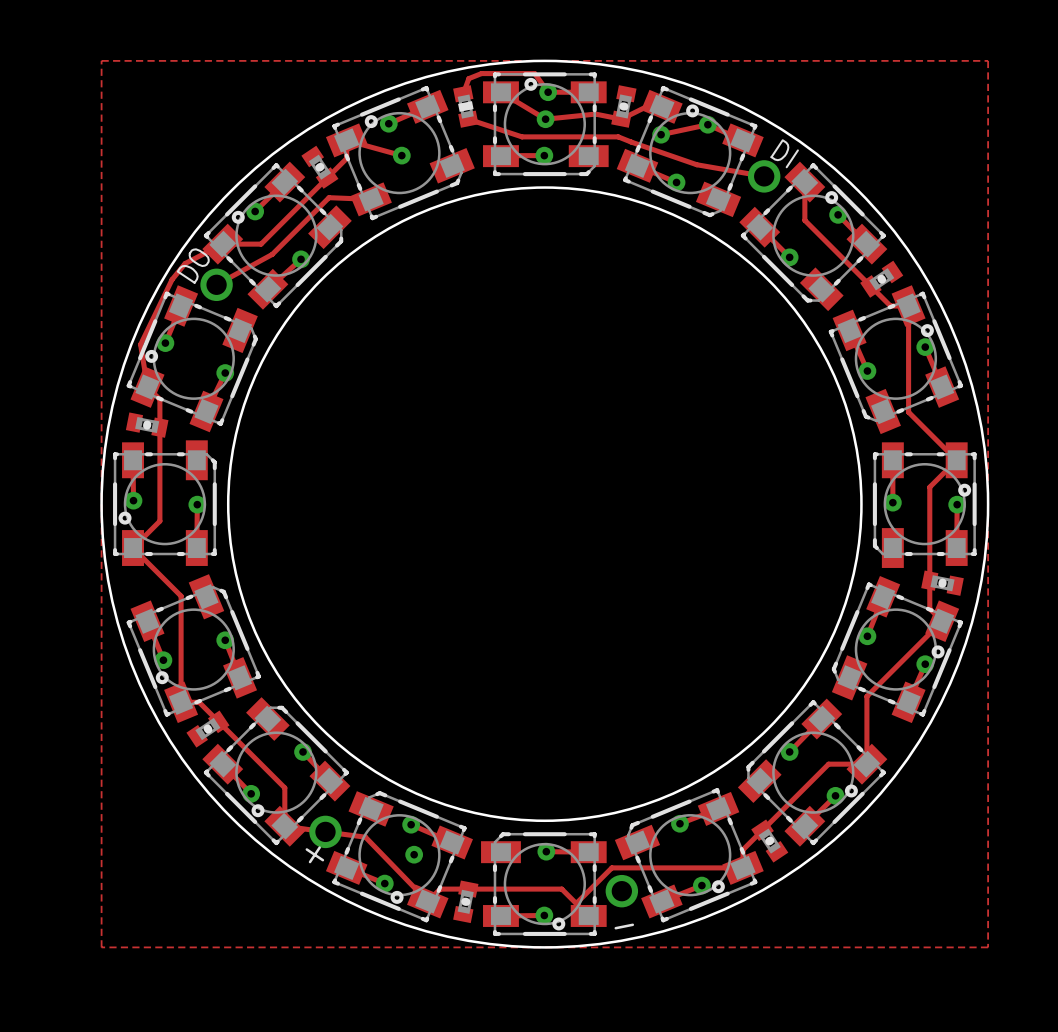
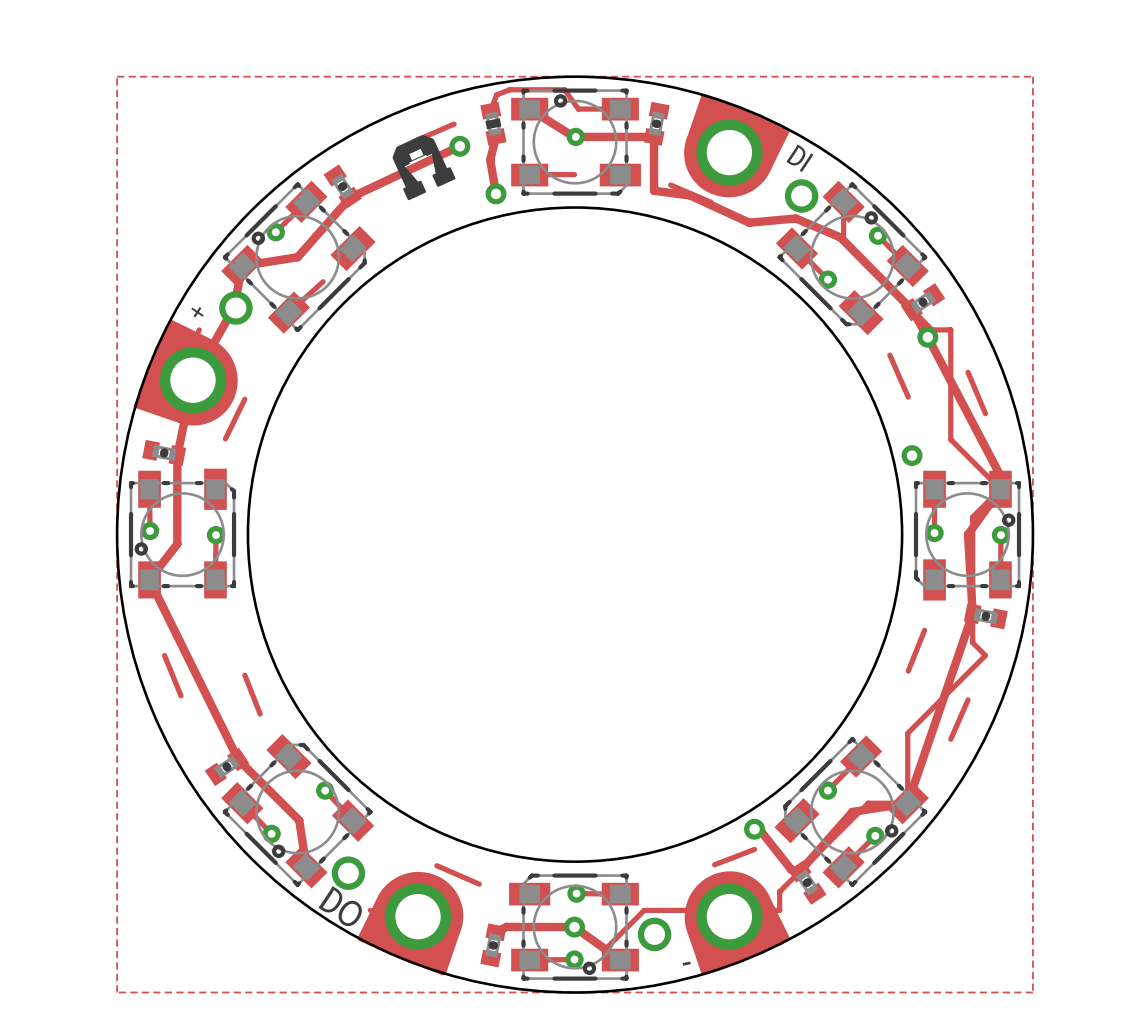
track: (500, 92) (545, 119) (595, 114) (621, 119) (652, 104) (661, 106) -> (529, 109) (573, 136) (654, 136) (654, 190) (690, 195) (749, 222) (795, 218) (840, 237) (911, 309) (1001, 477) (1000, 489) (968, 534) (972, 613) (907, 803) (852, 811) (799, 871) (791, 869) (761, 832) (754, 829)
via: (548, 92) -> none
drawing: none -> [392, 135, 456, 201]
track: (468, 119) (522, 136) (618, 136) (696, 164) (764, 176) -> (496, 136) (490, 159) (496, 193)
via: (388, 123) -> none
via: (707, 124) -> none
part: none -> (736, 145)
track: none -> (459, 146) (350, 197) (297, 257) (242, 265) (233, 308) (192, 380) (177, 455) (177, 544) (149, 579) (238, 759) (299, 820) (306, 867)
via: none -> (459, 146)
track: (661, 134) (707, 124) (742, 140) -> none
via: (661, 134) -> none
part: (690, 151) -> none
part: (400, 153) -> none
DI name position: DI (784, 153) -> DI (799, 158)
track: (401, 155) (346, 140) (346, 158) (261, 244) (222, 244) (185, 263) (172, 279) (140, 344) (147, 387) (159, 399) (159, 521) (133, 548) (181, 596) (181, 702) (199, 702) (284, 787) (284, 826) (365, 837) (427, 901) (440, 889) (561, 889) (588, 915) -> (495, 932) (506, 926) (574, 927) (620, 960)
via: (401, 155) -> none
via: (544, 155) -> none
via: none -> (496, 193)
via: (676, 182) -> none
track: (371, 199) (329, 197) (272, 254) (216, 284) -> none
via: (301, 259) -> none
DO name: DO (193, 266) -> + (197, 312)
via: none -> (927, 337)
via: (165, 343) -> none
part: none -> (185, 372)
via: (925, 347) -> none
part: (192, 358) -> none
part: (895, 359) -> none
via: (867, 371) -> none
via: (225, 373) -> none
via: none -> (912, 455)
via: (867, 636) -> none
via: (225, 640) -> none
part: (193, 648) -> none
part: (897, 649) -> none
via: (163, 660) -> none
via: (925, 664) -> none
via: none -> (754, 829)
via: (679, 823) -> none
via: (411, 824) -> none
DO name: + (314, 854) -> DO (340, 906)
via: (414, 854) -> none
part: (689, 855) -> none
part: (399, 856) -> none
part: none -> (410, 923)
part: none -> (737, 923)
via: (384, 883) -> none
via: none -> (574, 927)
via: (701, 885) -> none
part name position: - (624, 926) -> - (686, 963)

